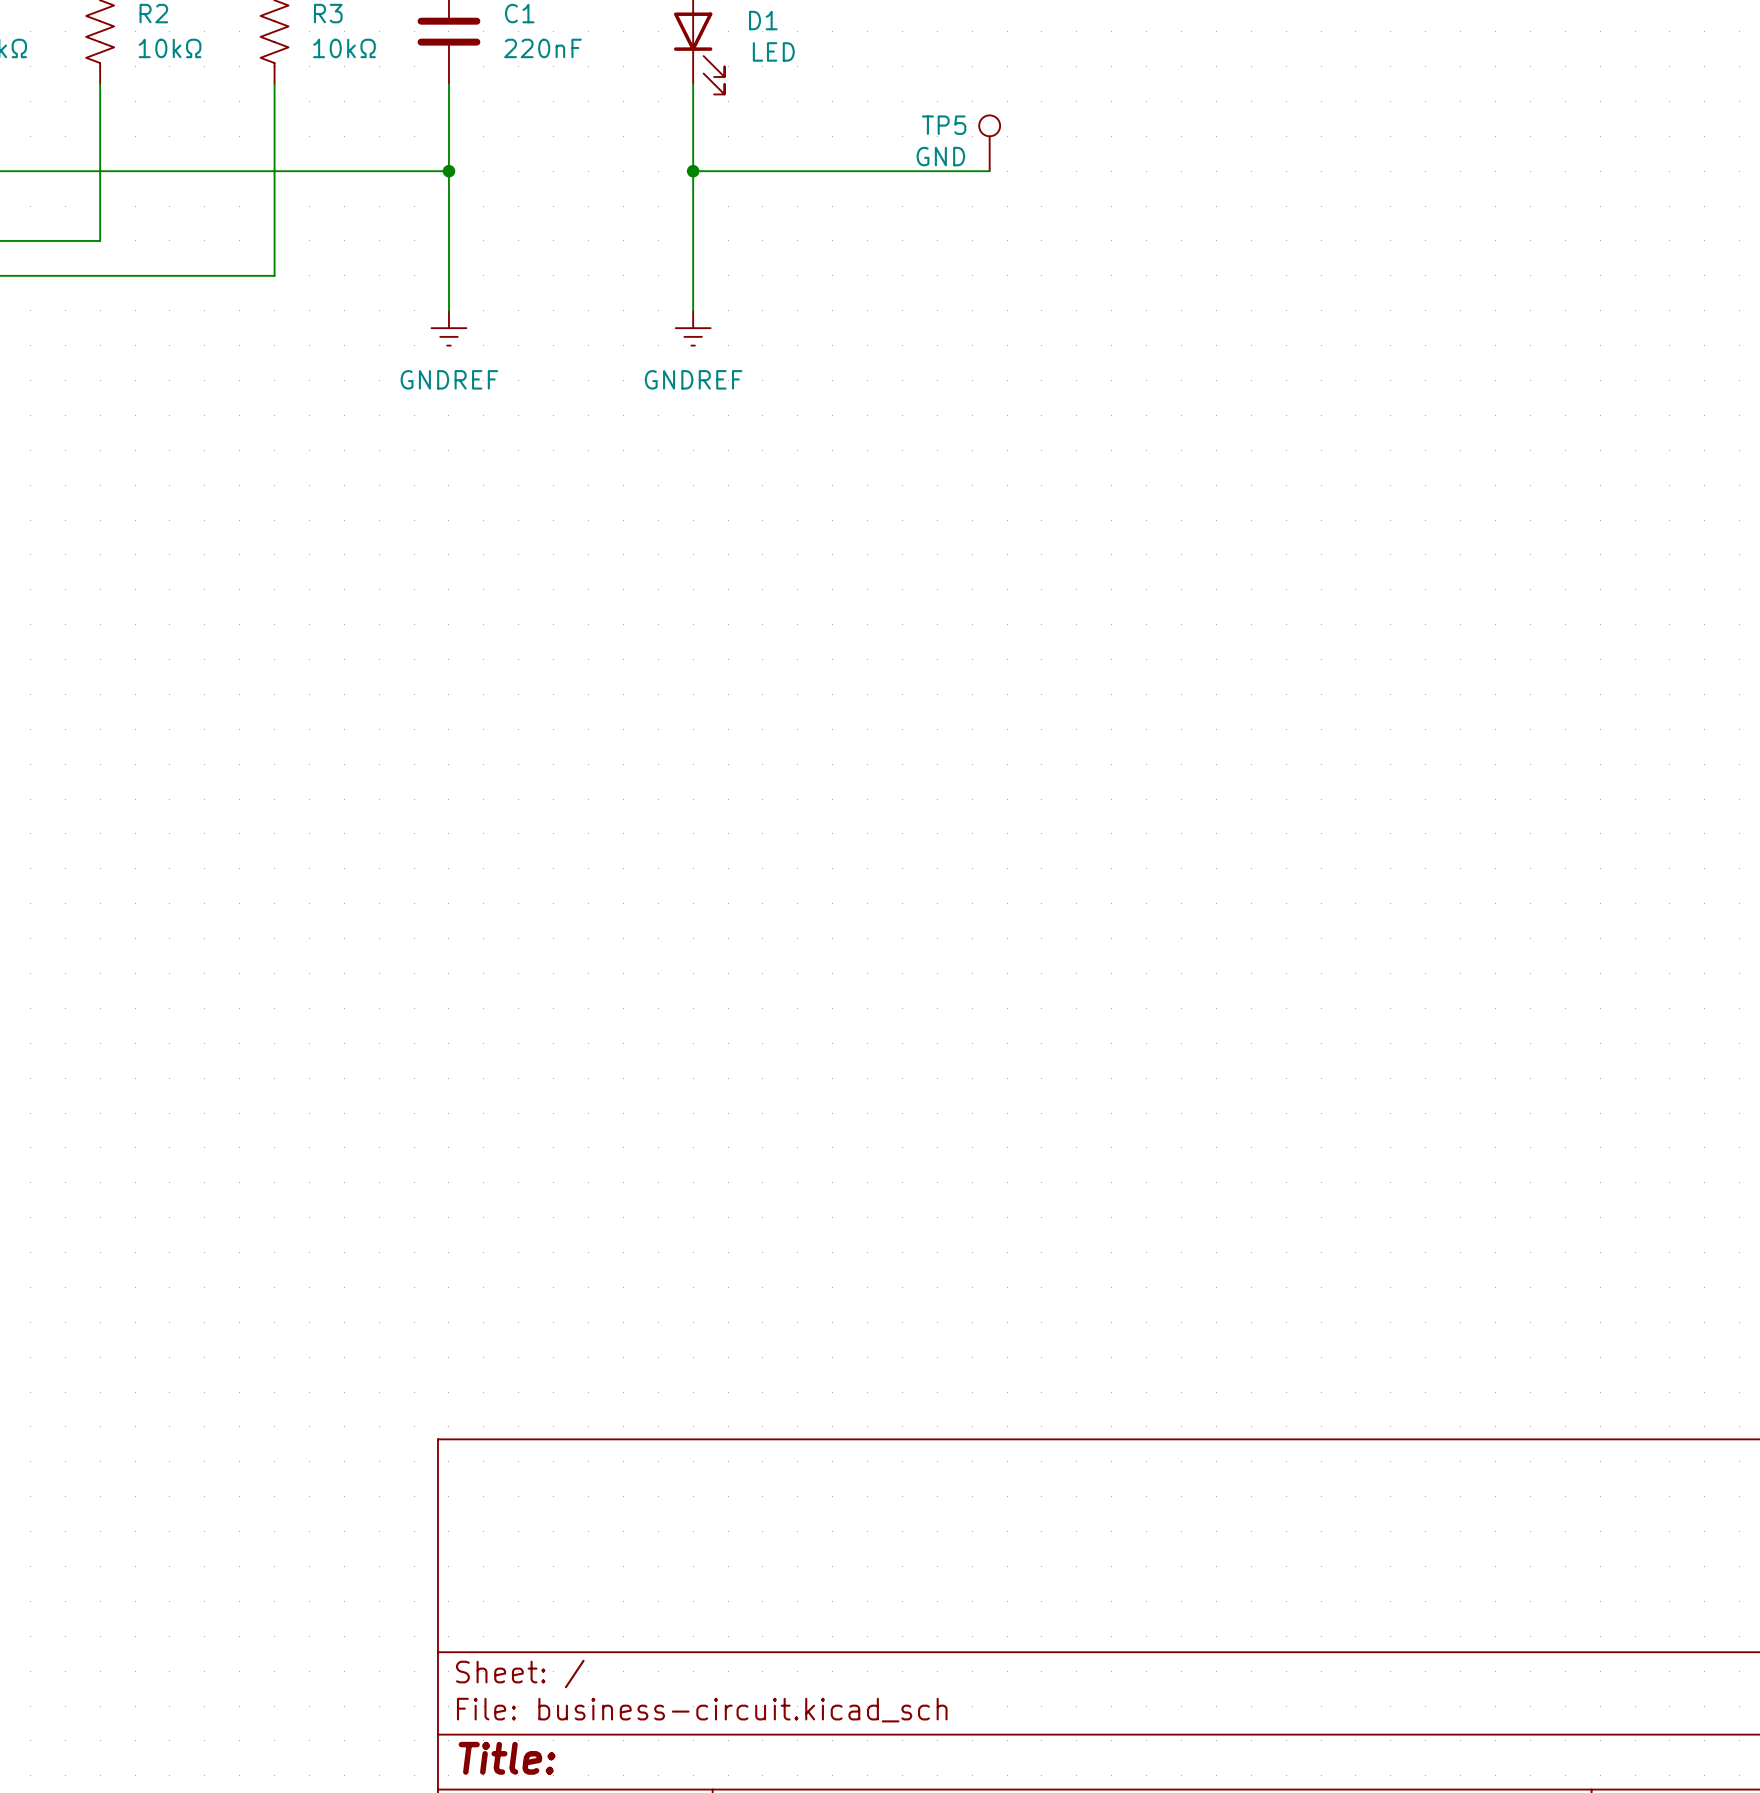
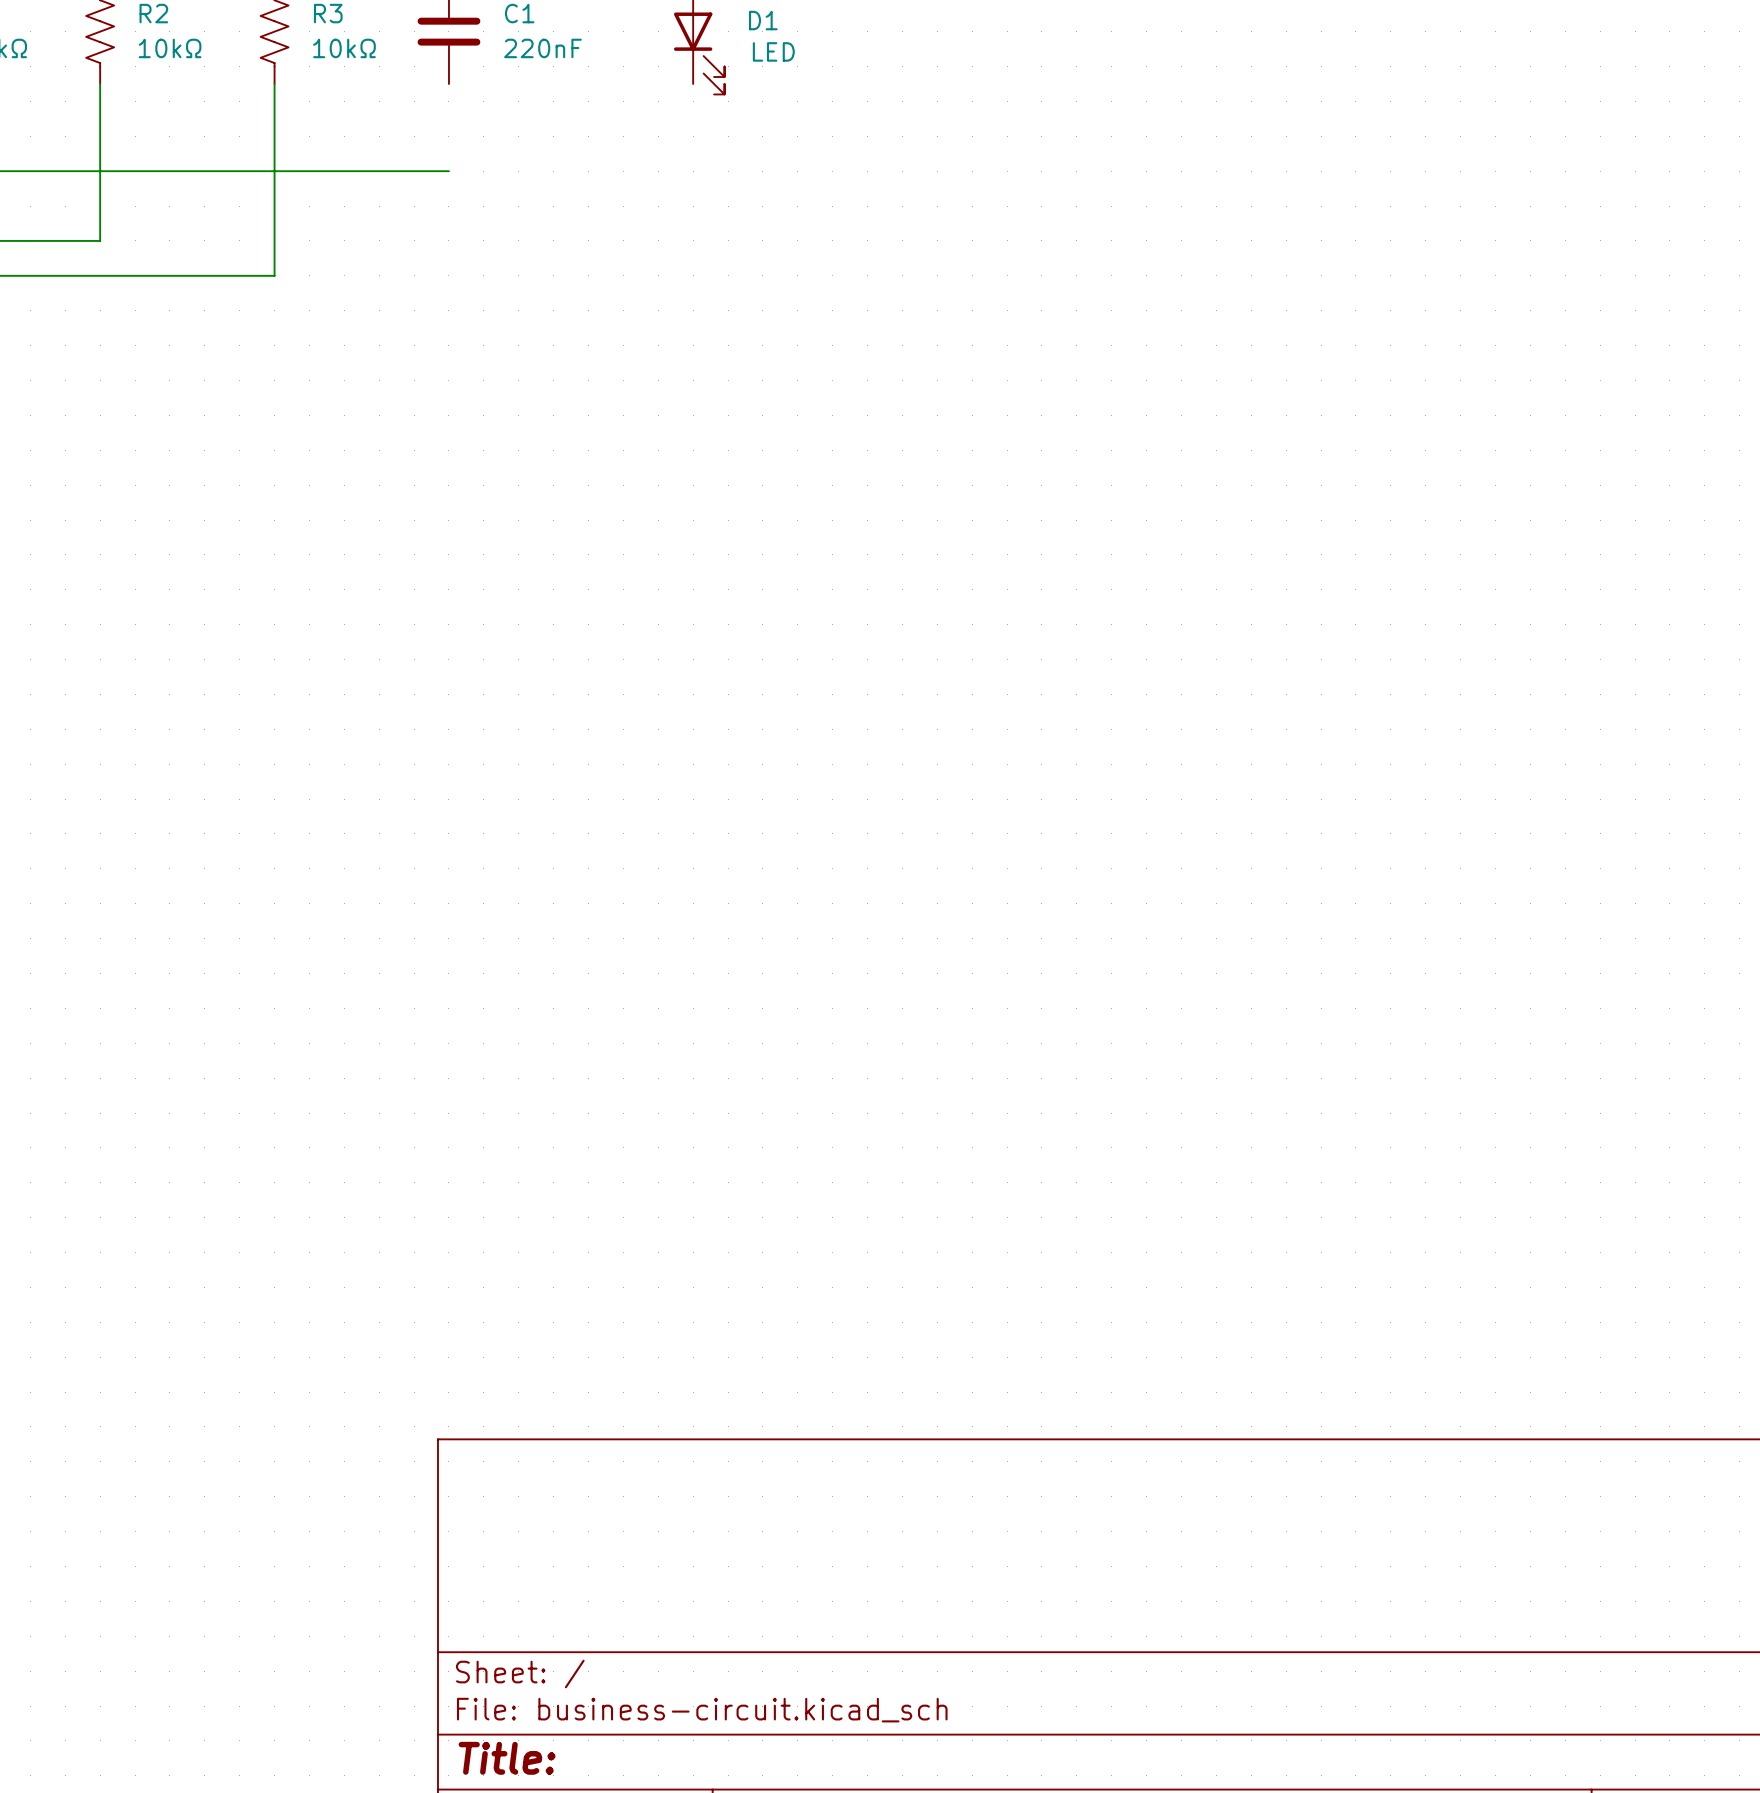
wire: (448, 83) (448, 310) -> none
wire: (693, 83) (693, 310) -> none
TP5: GND (989, 143) -> none
junction: (448, 171) -> none
wire: (693, 171) (989, 171) -> none
junction: (693, 171) -> none
power symbol: GNDREF (448, 328) -> none
power symbol: GNDREF (693, 328) -> none

